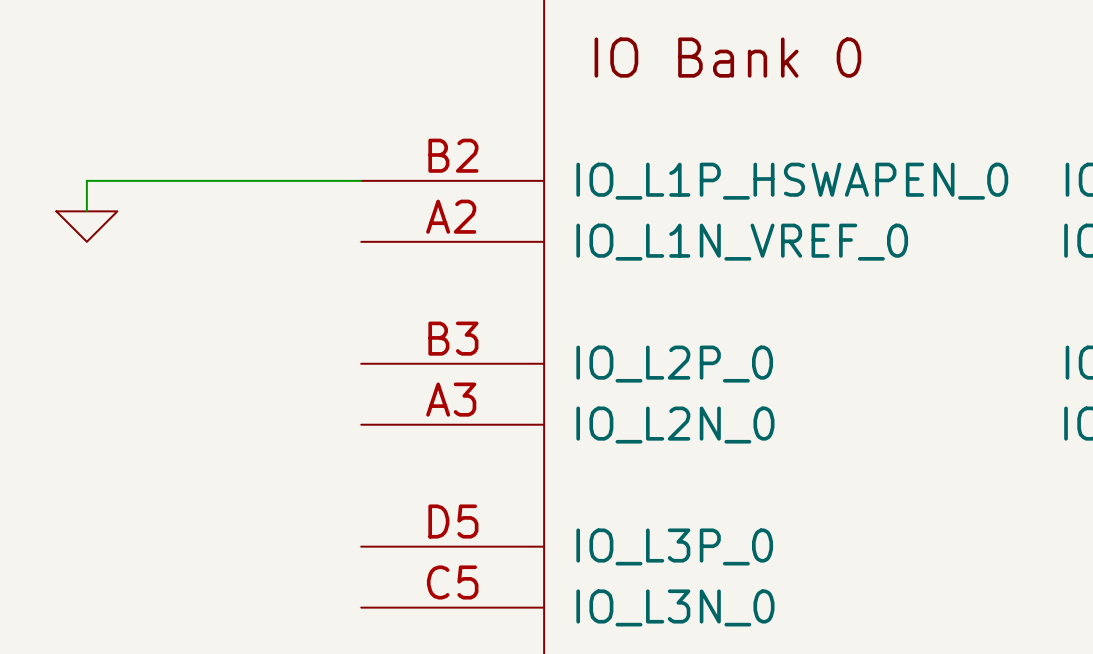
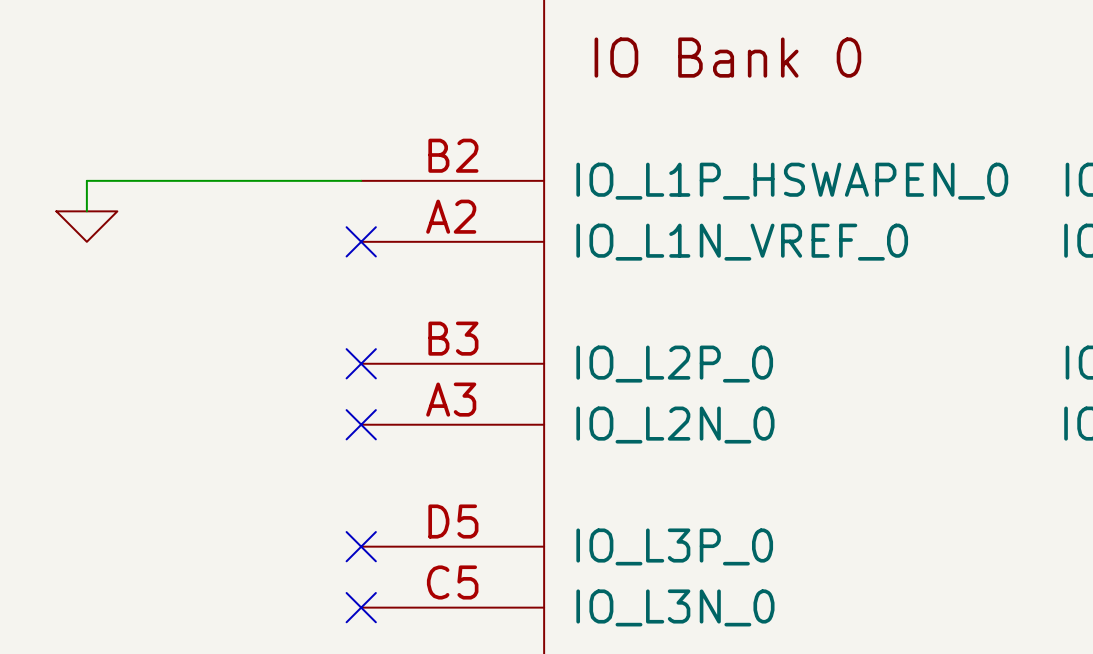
no-connect mark: none -> (361, 241)
no-connect mark: none -> (361, 363)
no-connect mark: none -> (361, 424)
no-connect mark: none -> (361, 546)
no-connect mark: none -> (361, 607)

